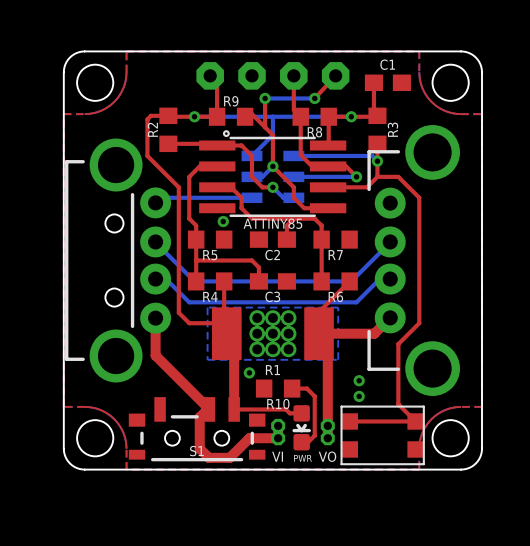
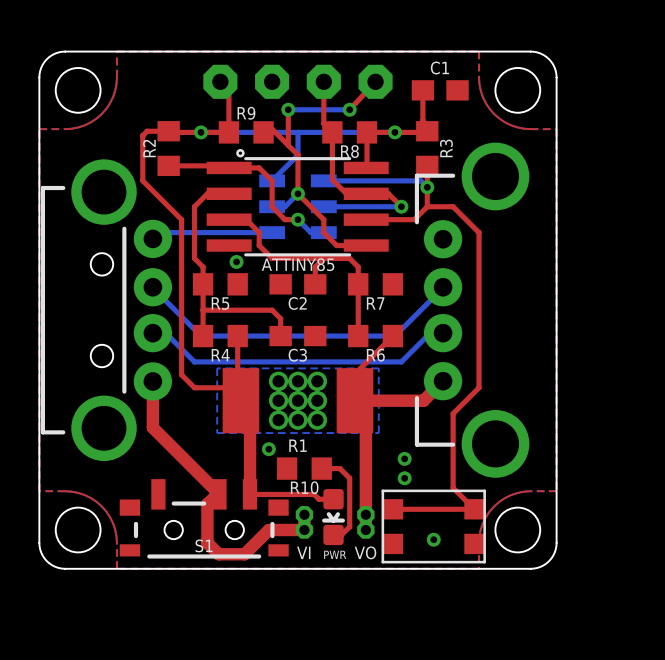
via: none -> (433, 539)

